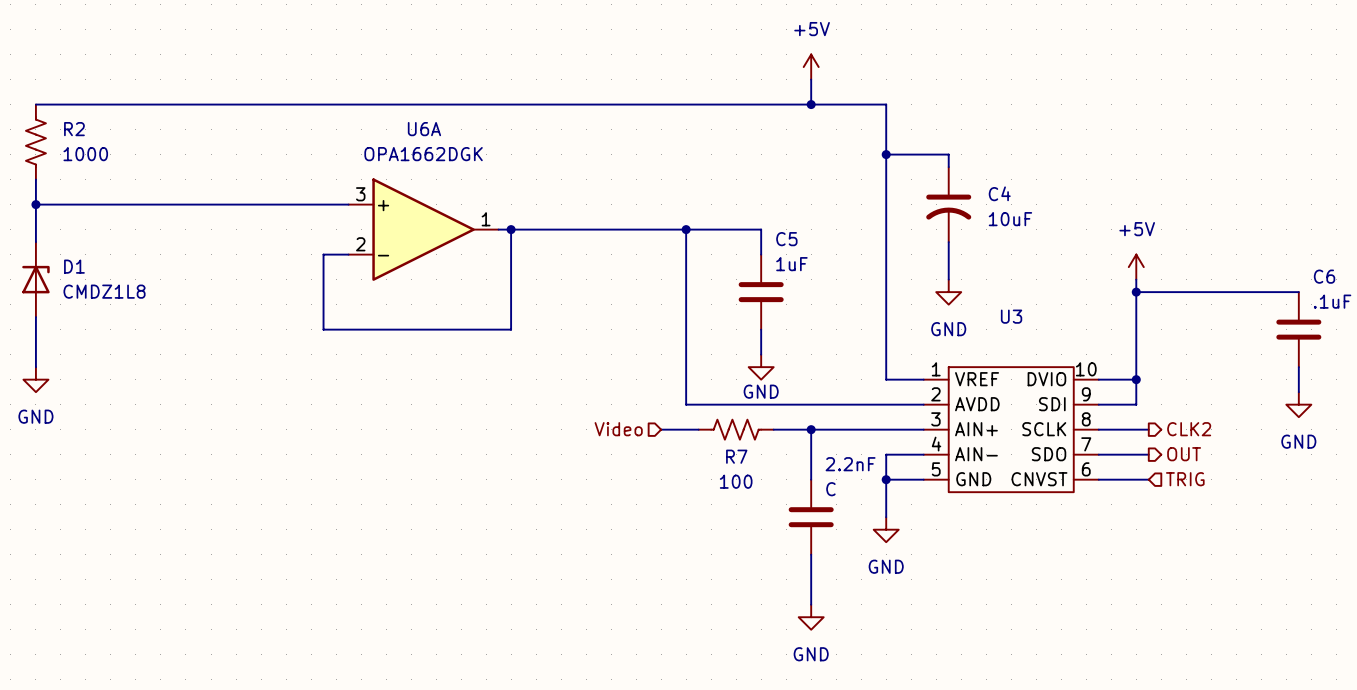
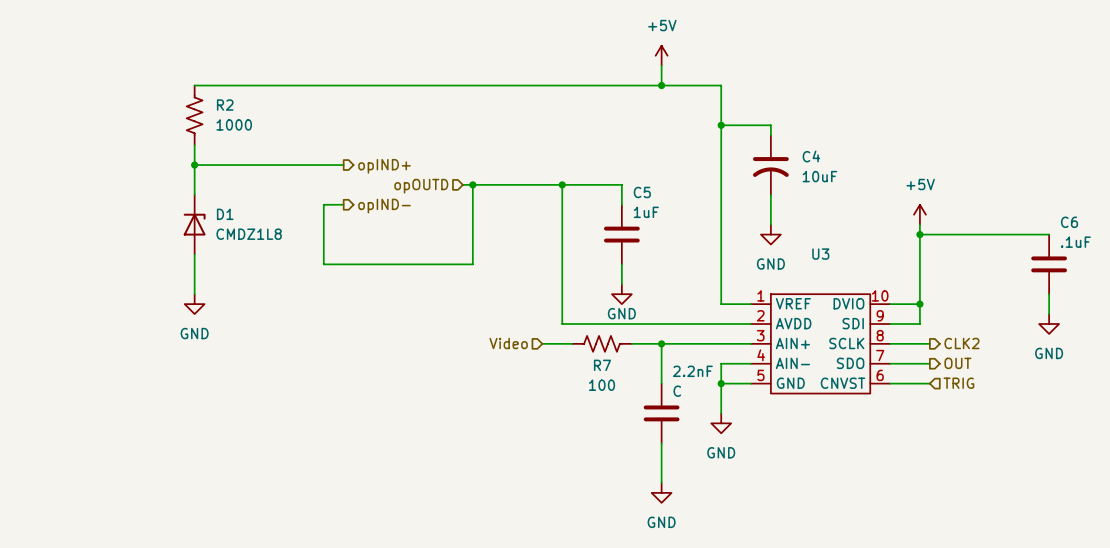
wire: (35, 104) (223, 104) -> none
R2 position: (35, 142) -> (194, 115)
wire: (35, 179) (35, 242) -> (194, 145) (194, 194)
wire: (35, 204) (223, 204) -> none
junction: (35, 204) -> none
junction: none -> (194, 165)
hierarchical label: none -> opIND+ (384, 166)
U6A: OPA1662DGK (423, 229) -> none
wire: (511, 229) (511, 329) -> (472, 184) (472, 264) (423, 264)
junction: (511, 229) -> none
junction: none -> (472, 184)
hierarchical label: none -> opOUTD (421, 186)
wire: (348, 254) (323, 254) (323, 329) (386, 329) -> (343, 204) (323, 204) (323, 264)
hierarchical label: none -> opIND- (384, 206)
D1 position: (35, 279) -> (194, 224)
wire: (35, 317) (35, 367) -> (194, 254) (194, 294)
power symbol position: GND (35, 379) -> GND (194, 304)

